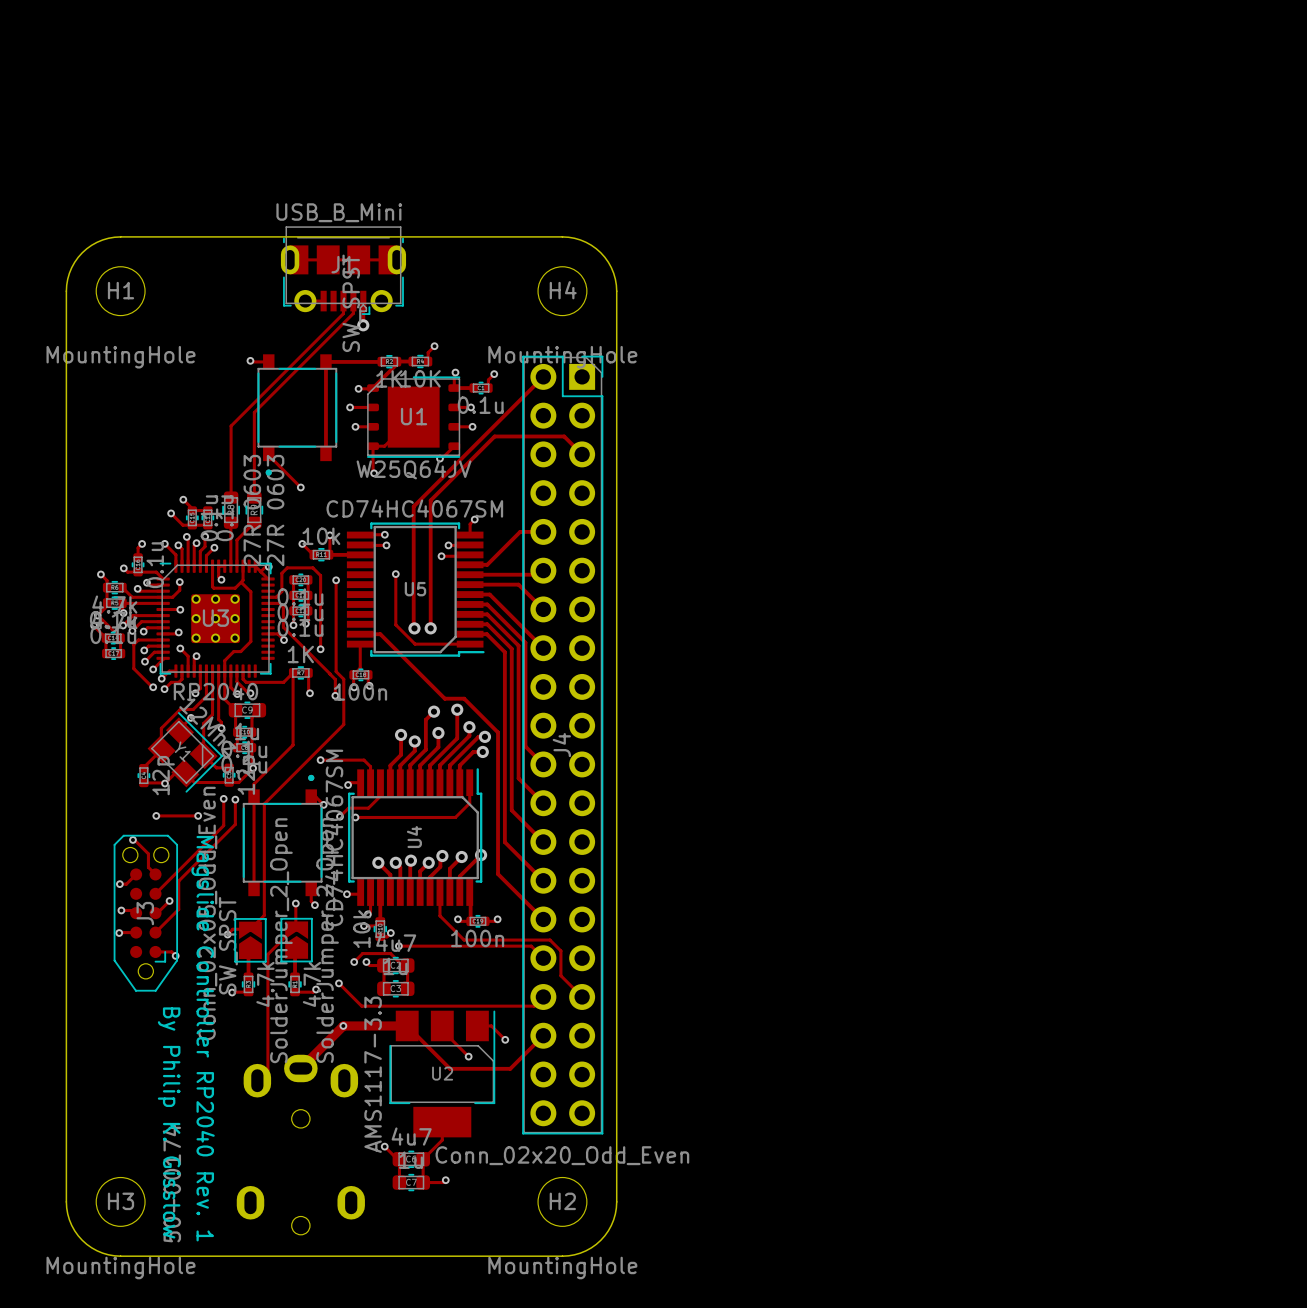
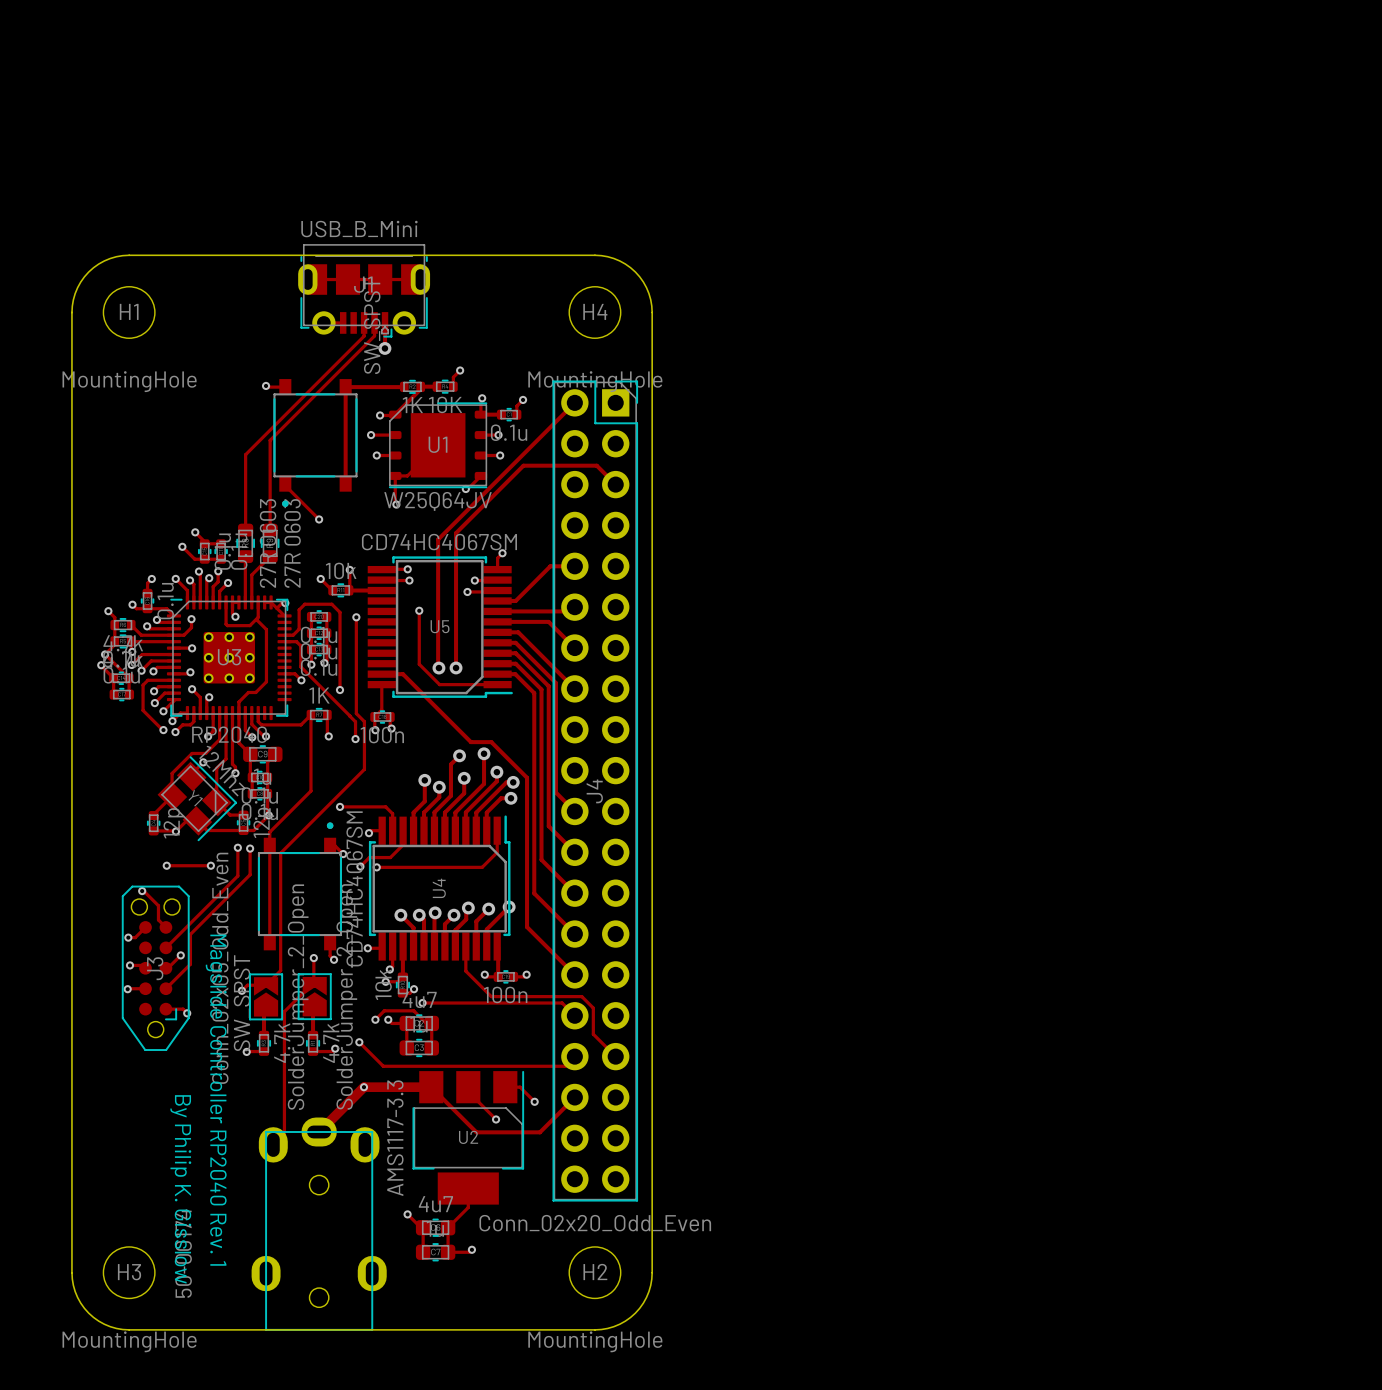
part footprint: [236, 1054, 365, 1235] -> [251, 1117, 387, 1331]

